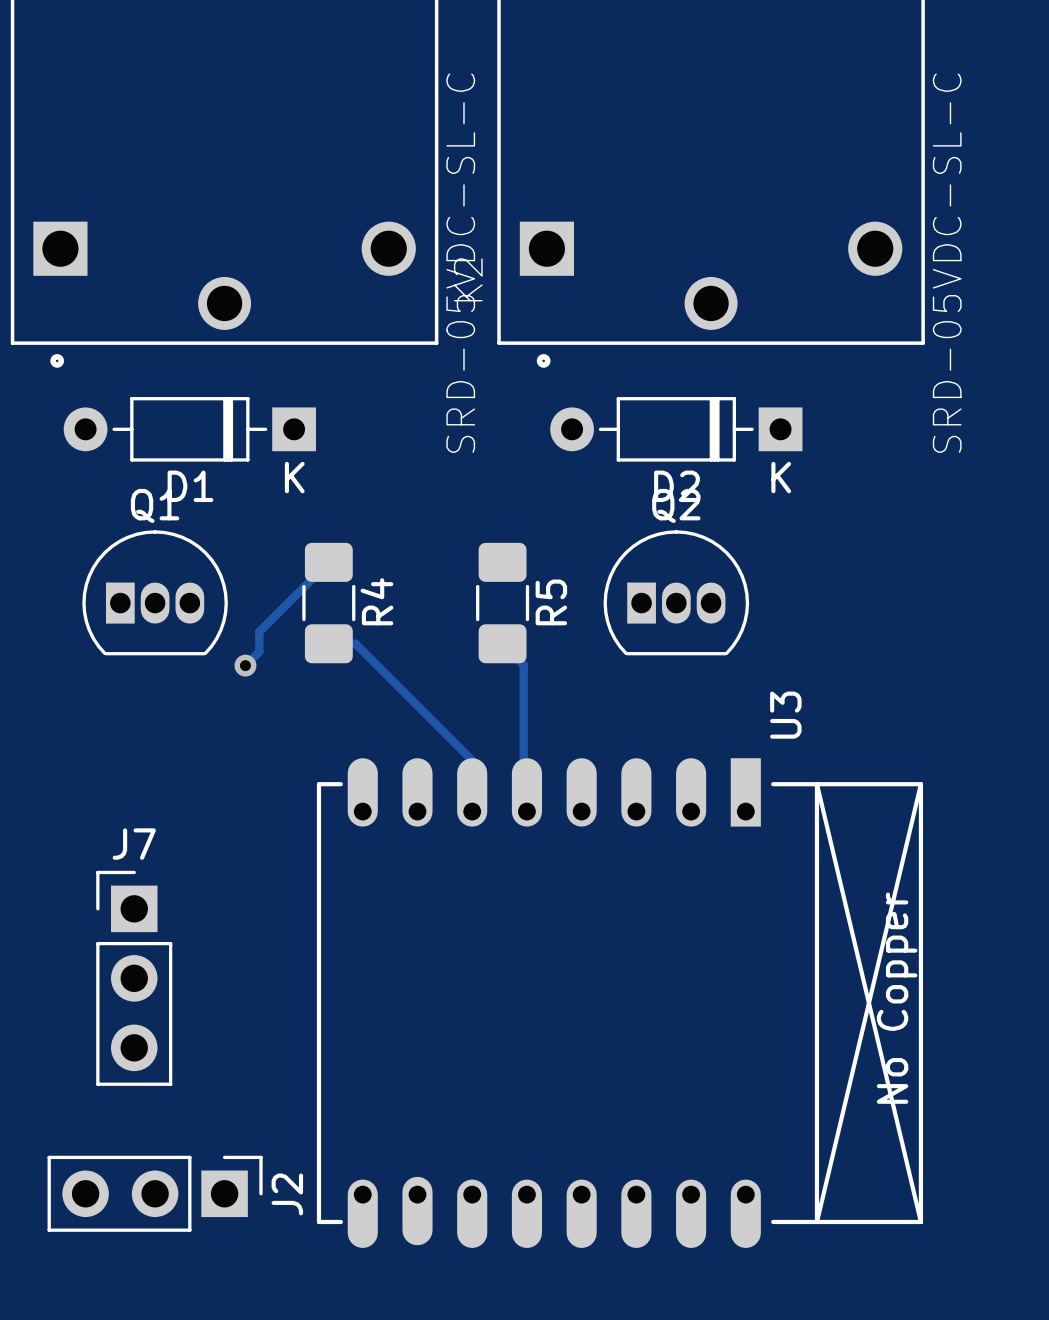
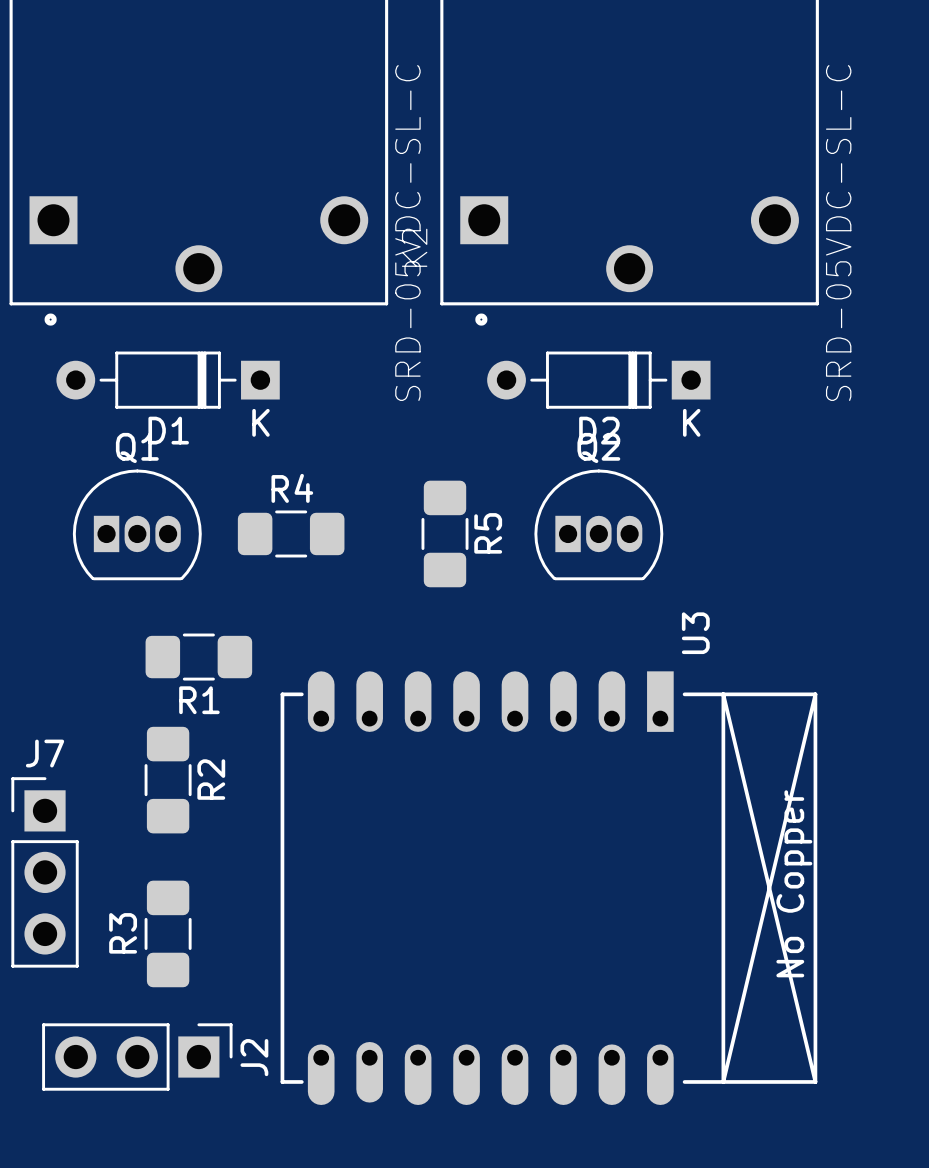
track: (328, 562) (259, 631) (259, 651) (245, 665) -> none
R4 name position: R4 (376, 601) -> R4 (292, 488)
R4 rotation: 0° (328, 603) -> 90° clockwise (291, 533)
track: (328, 643) (355, 643) (472, 760) (472, 811) -> none
track: (502, 643) (523, 664) (523, 808) (526, 811) -> none
via: (245, 665) -> none
R1: none -> (198, 657)
R2: none -> (168, 780)
J7 position: (134, 978) -> (45, 872)
R3: none -> (168, 933)

